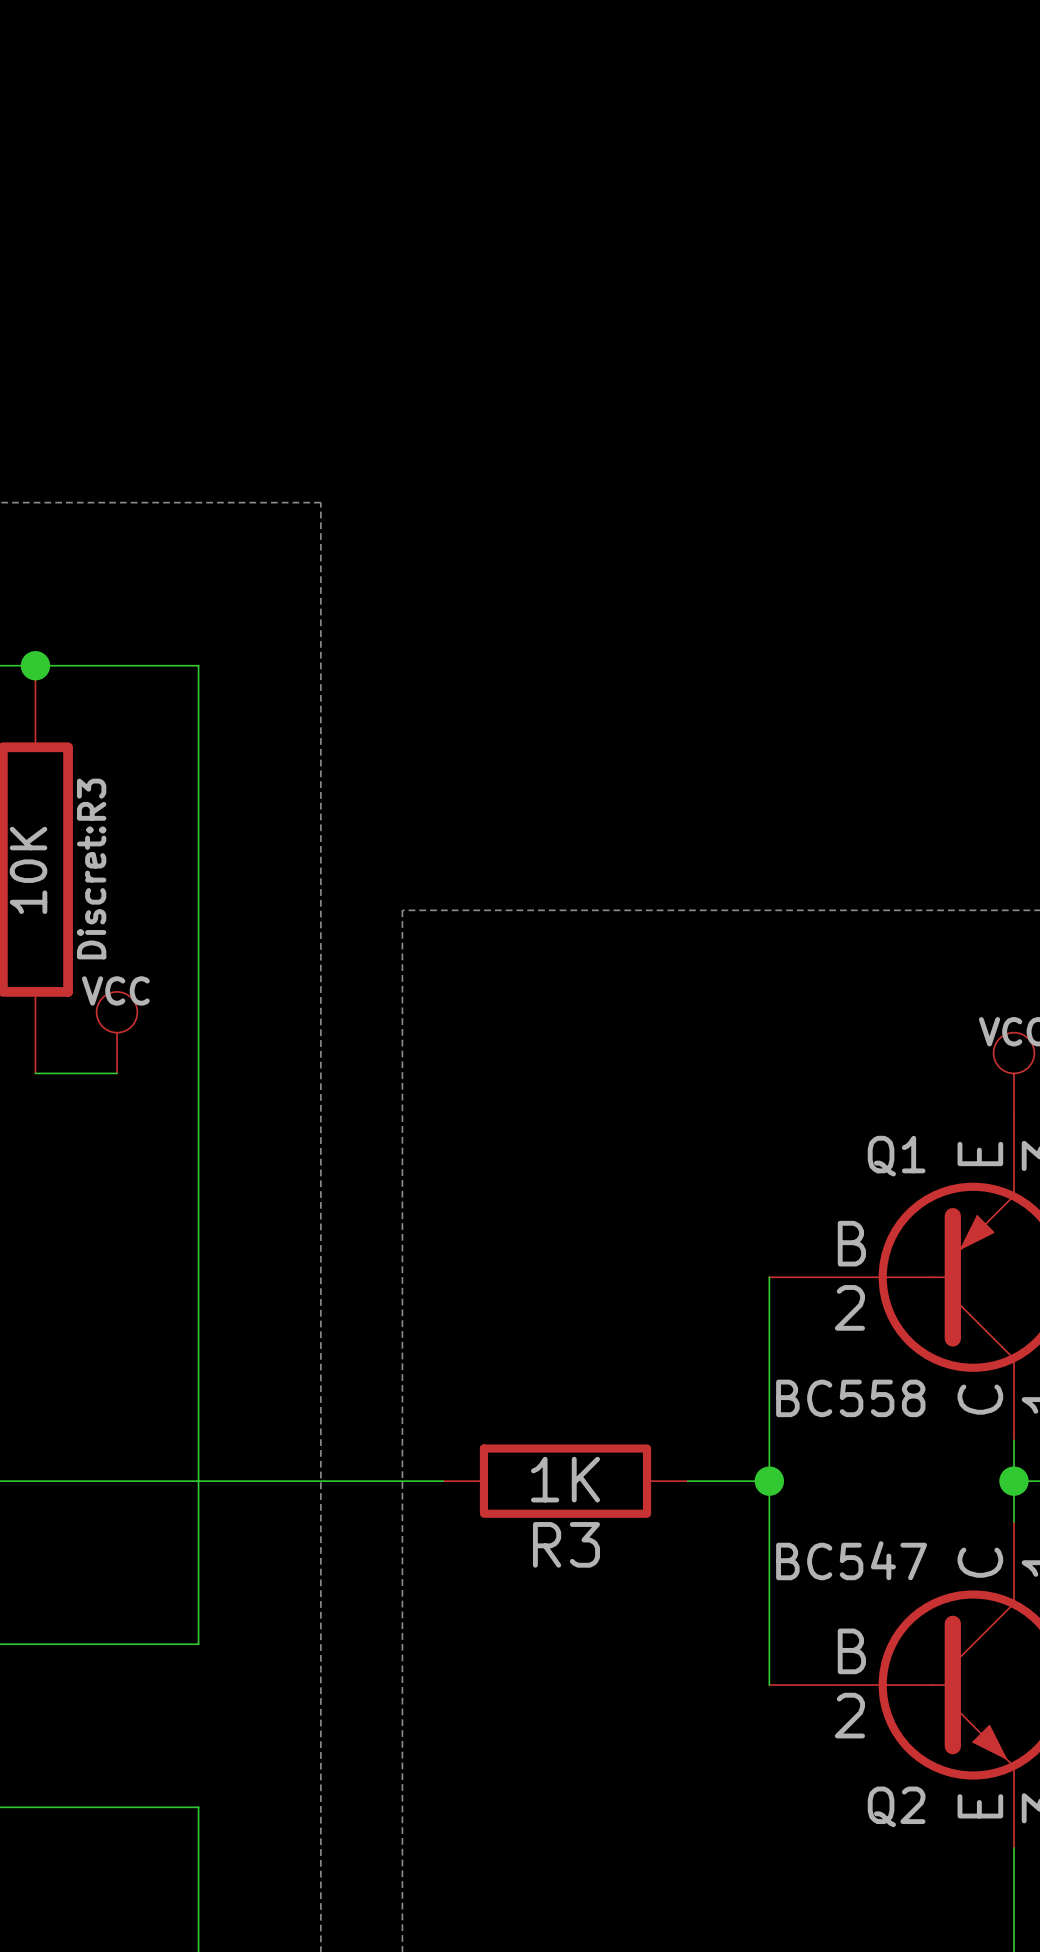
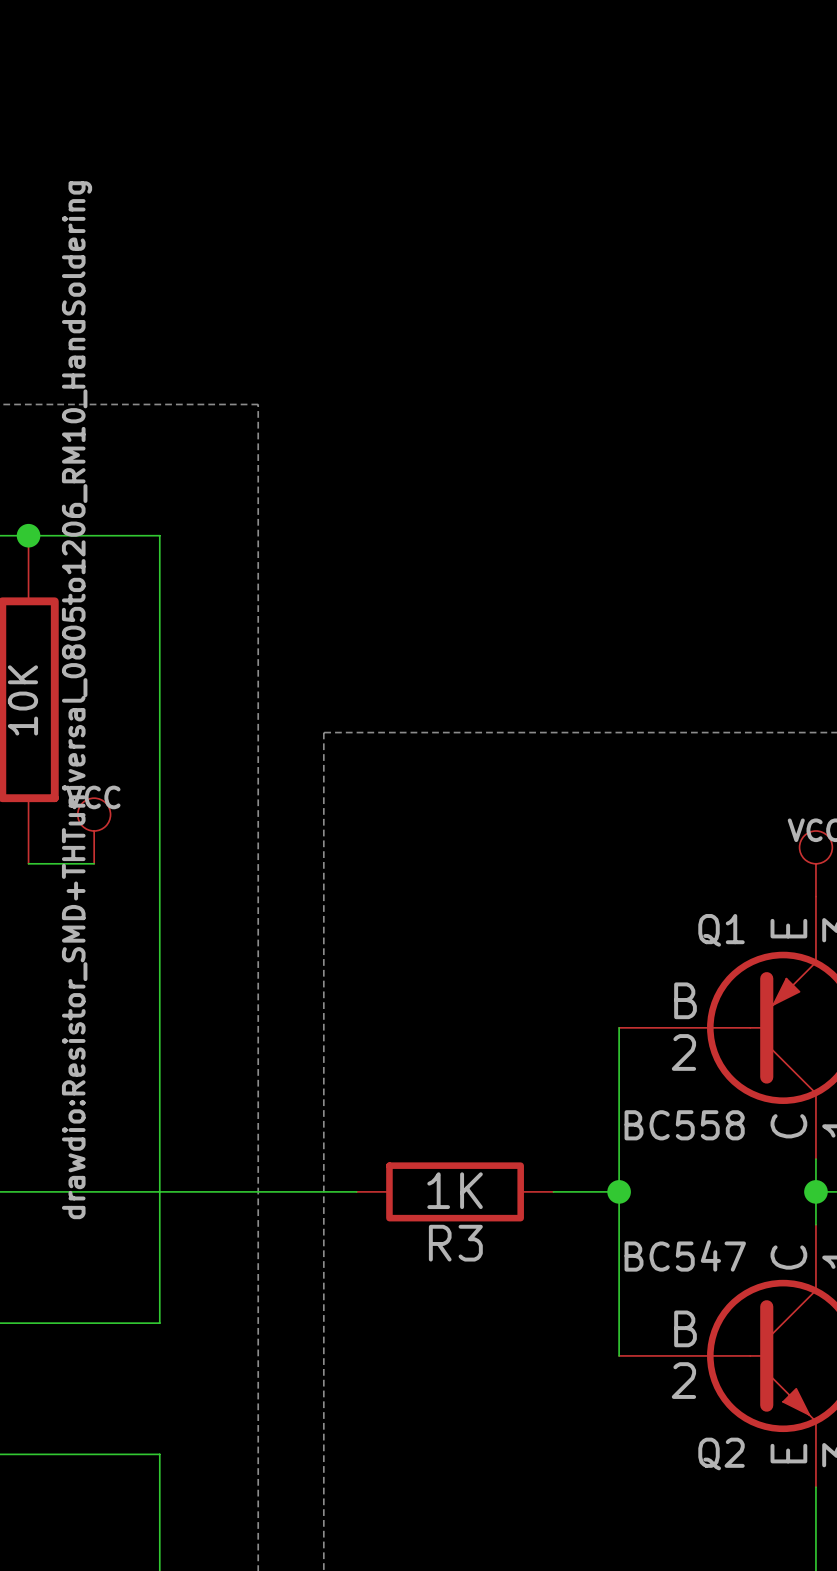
part text: Discret:R3 (91, 868) -> drawdio:Resistor_SMD+THTuniversal_0805to1206_RM10_HandSoldering (77, 700)

